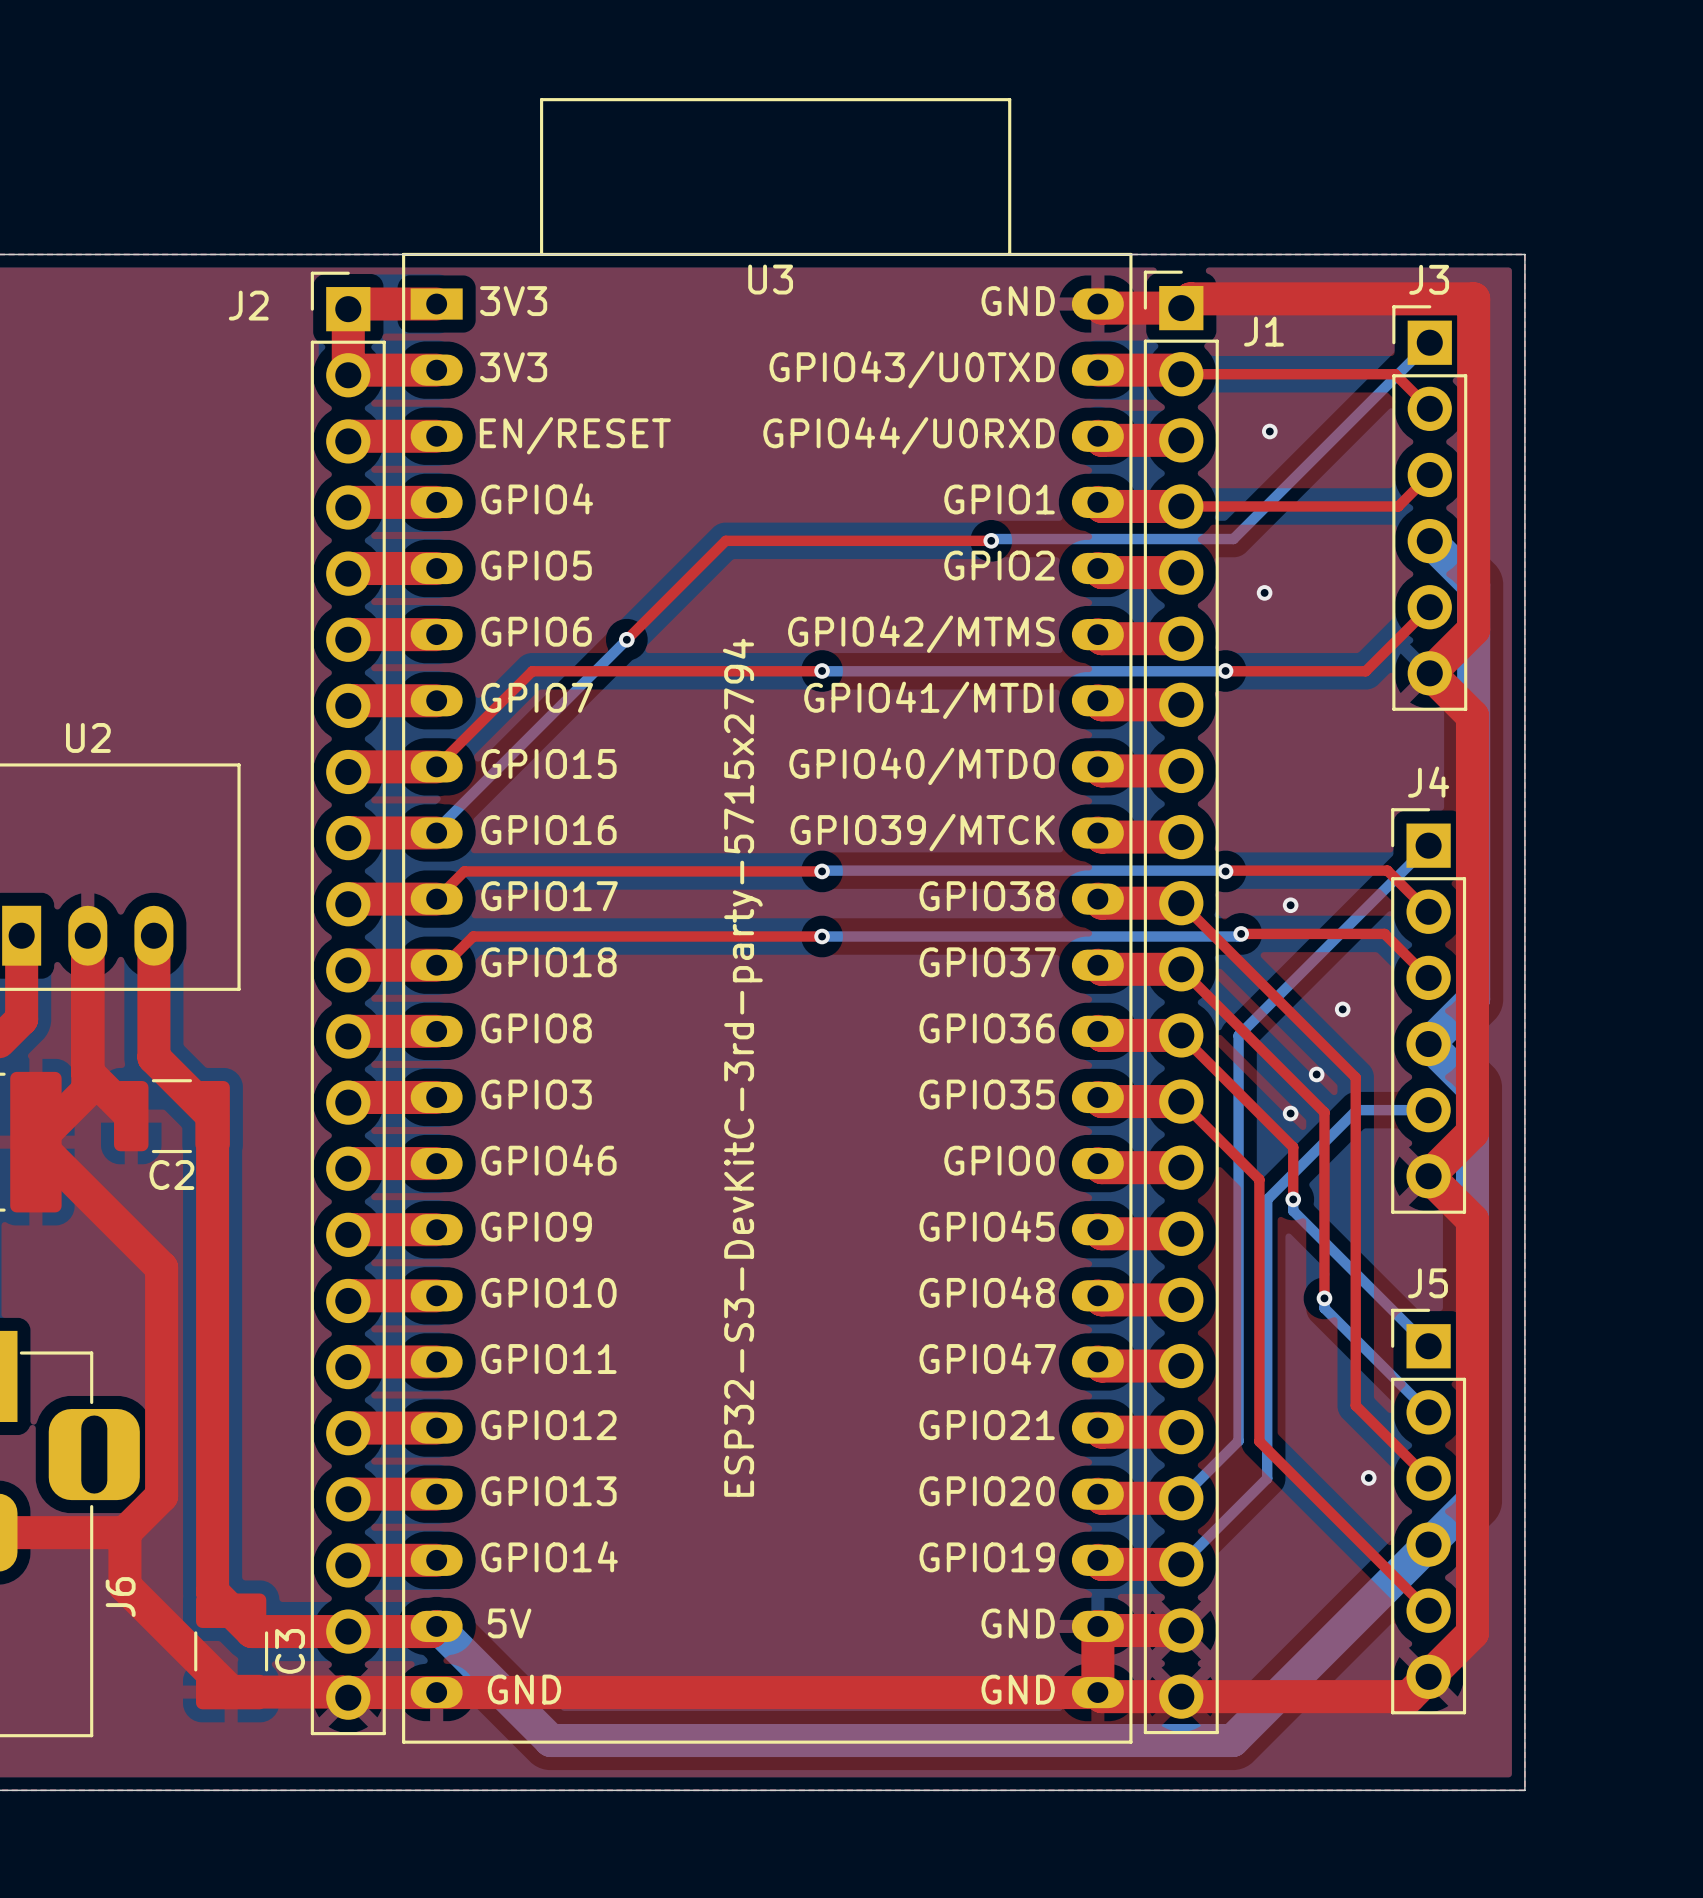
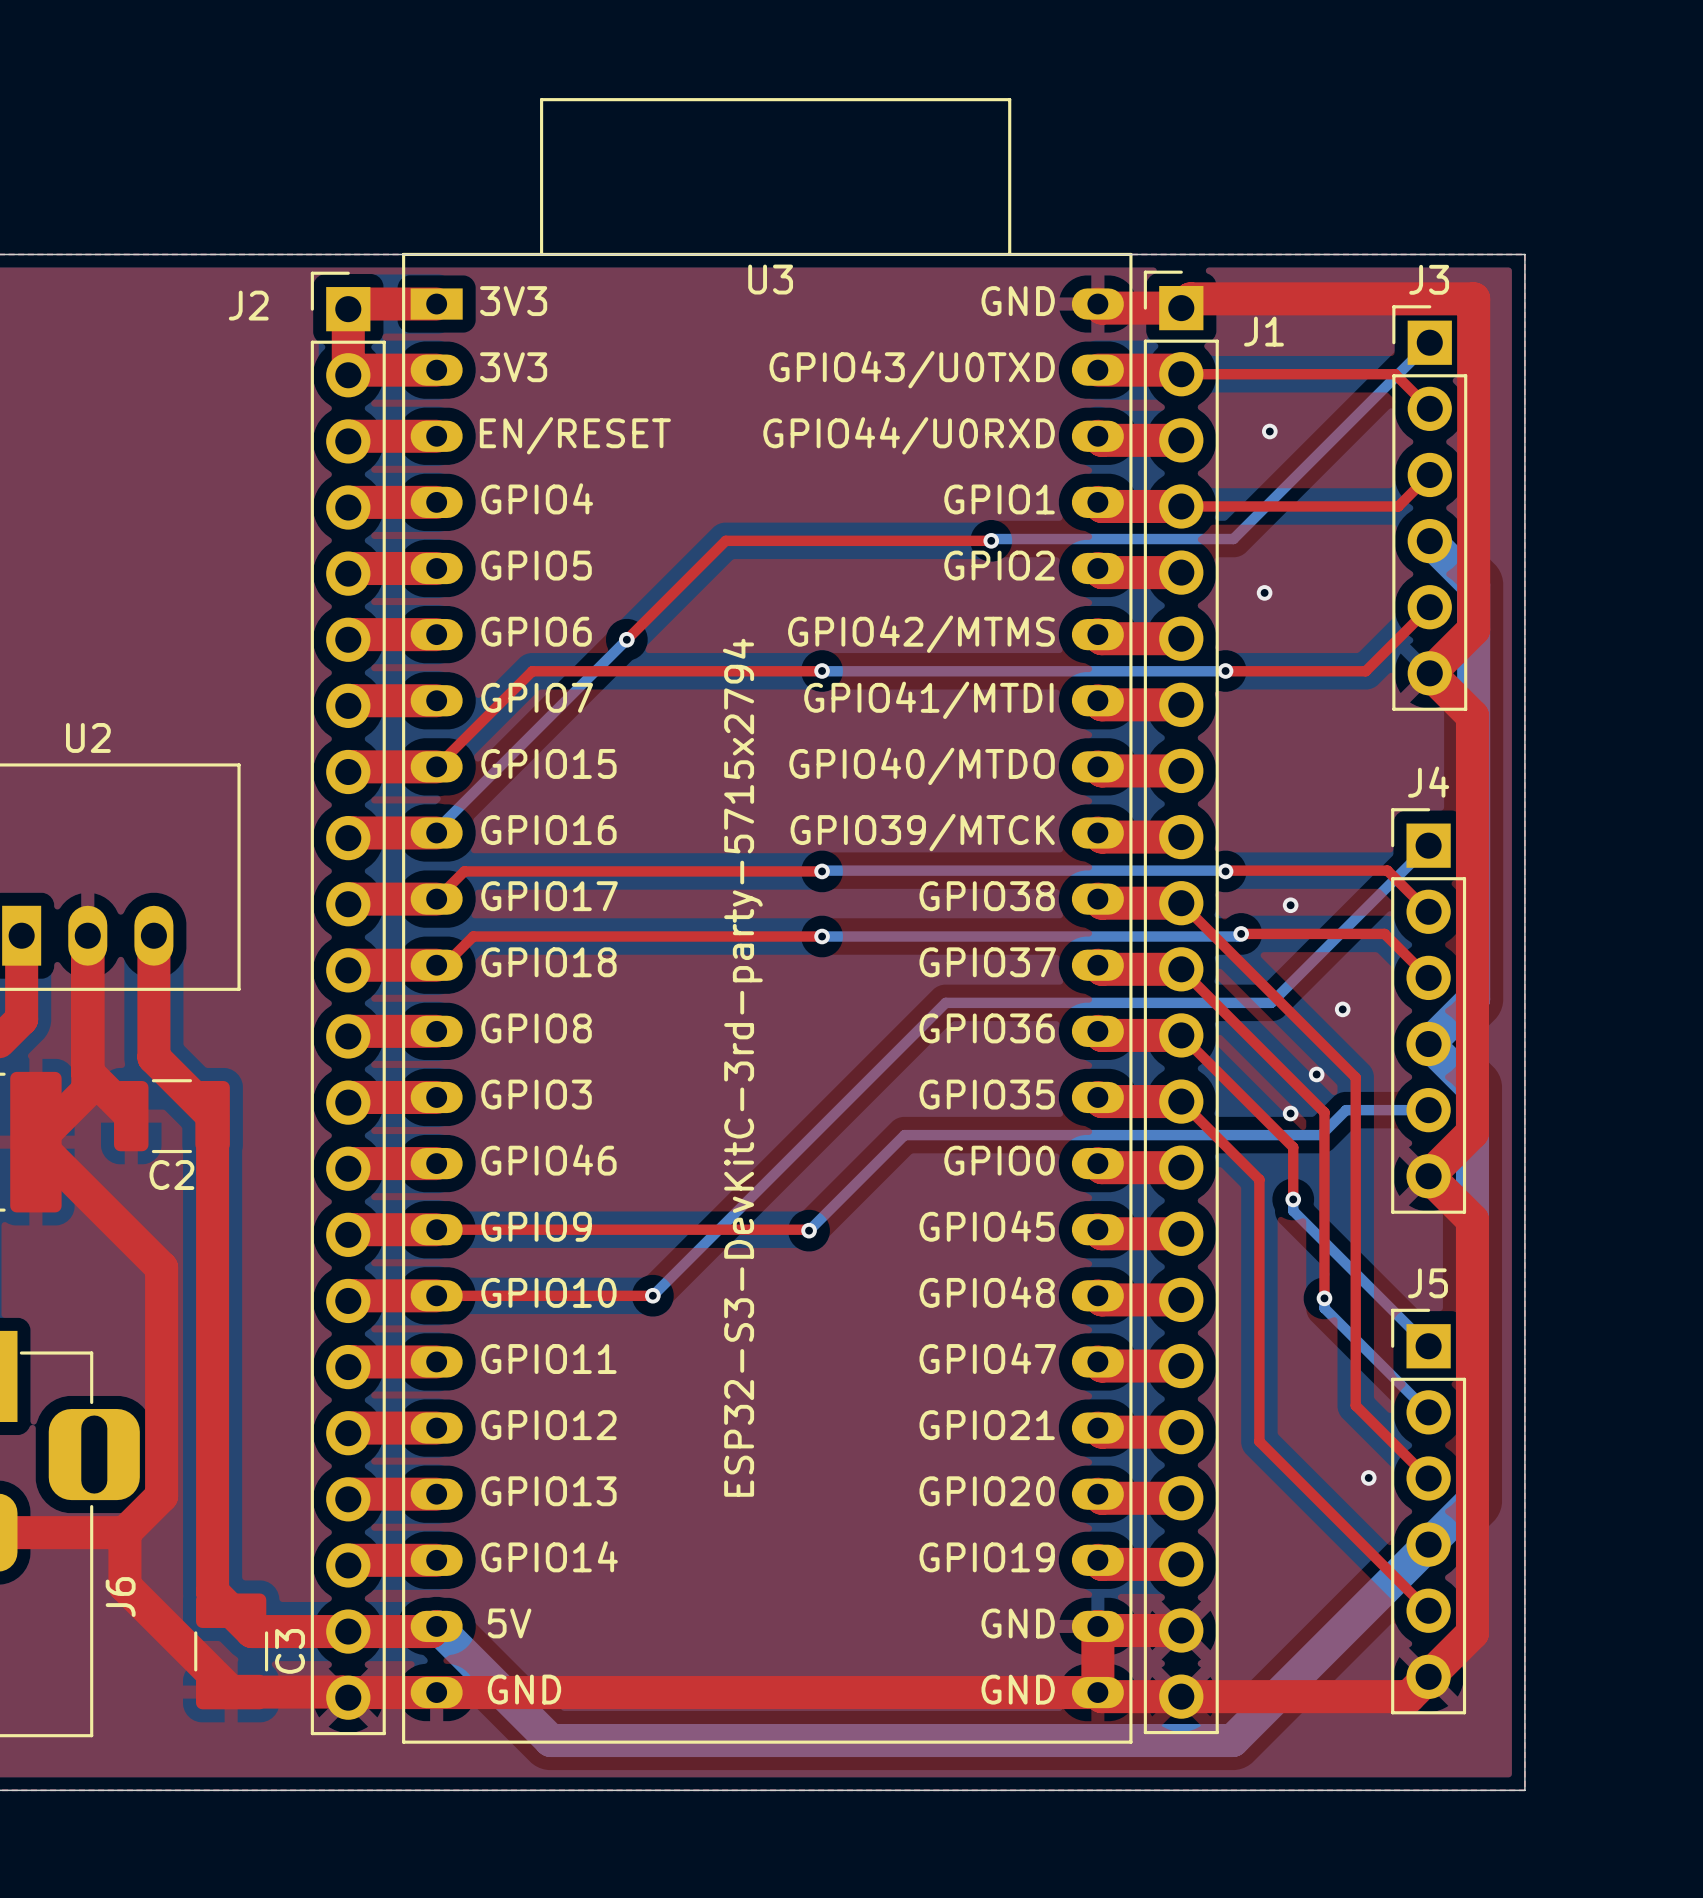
bottom track: (1271, 1002) (1238, 1035) (1238, 1441) (1181, 1498) -> (1271, 1002) (945, 1002) (652, 1295)
bottom track: (1356, 1110) (1267, 1199) (1267, 1478) (1181, 1564) -> (1356, 1110) (1346, 1110) (1321, 1135) (904, 1135) (809, 1230)
top track: none -> (436, 1229) (809, 1230)
via: none -> (809, 1230)
top track: none -> (436, 1295) (652, 1295)
via: none -> (652, 1295)

